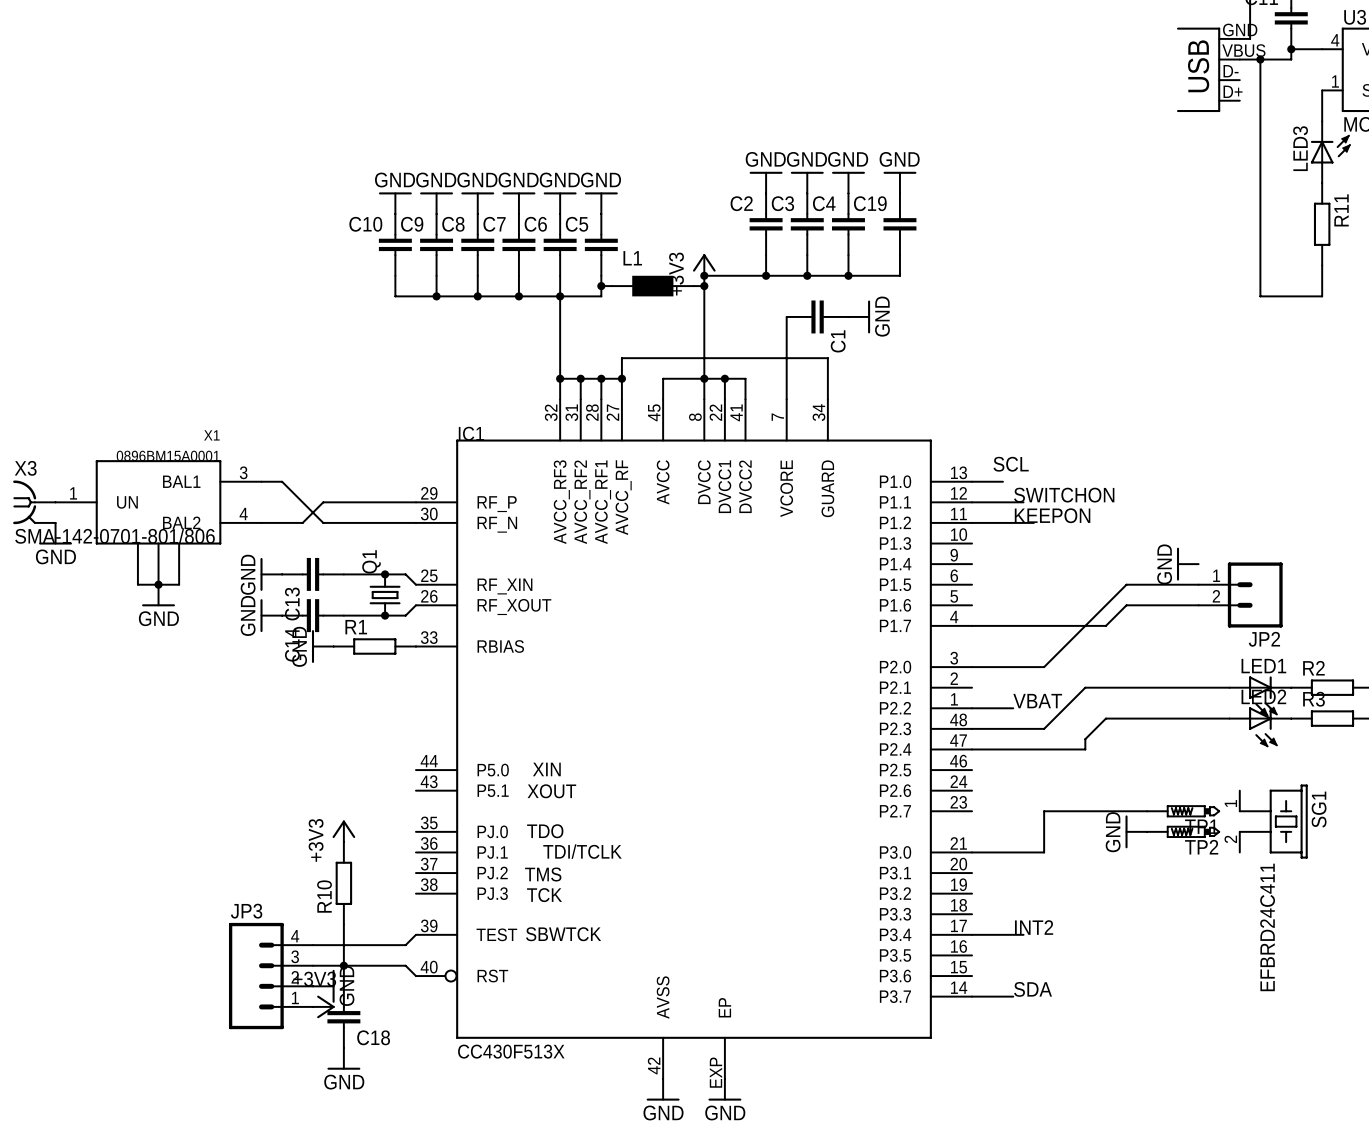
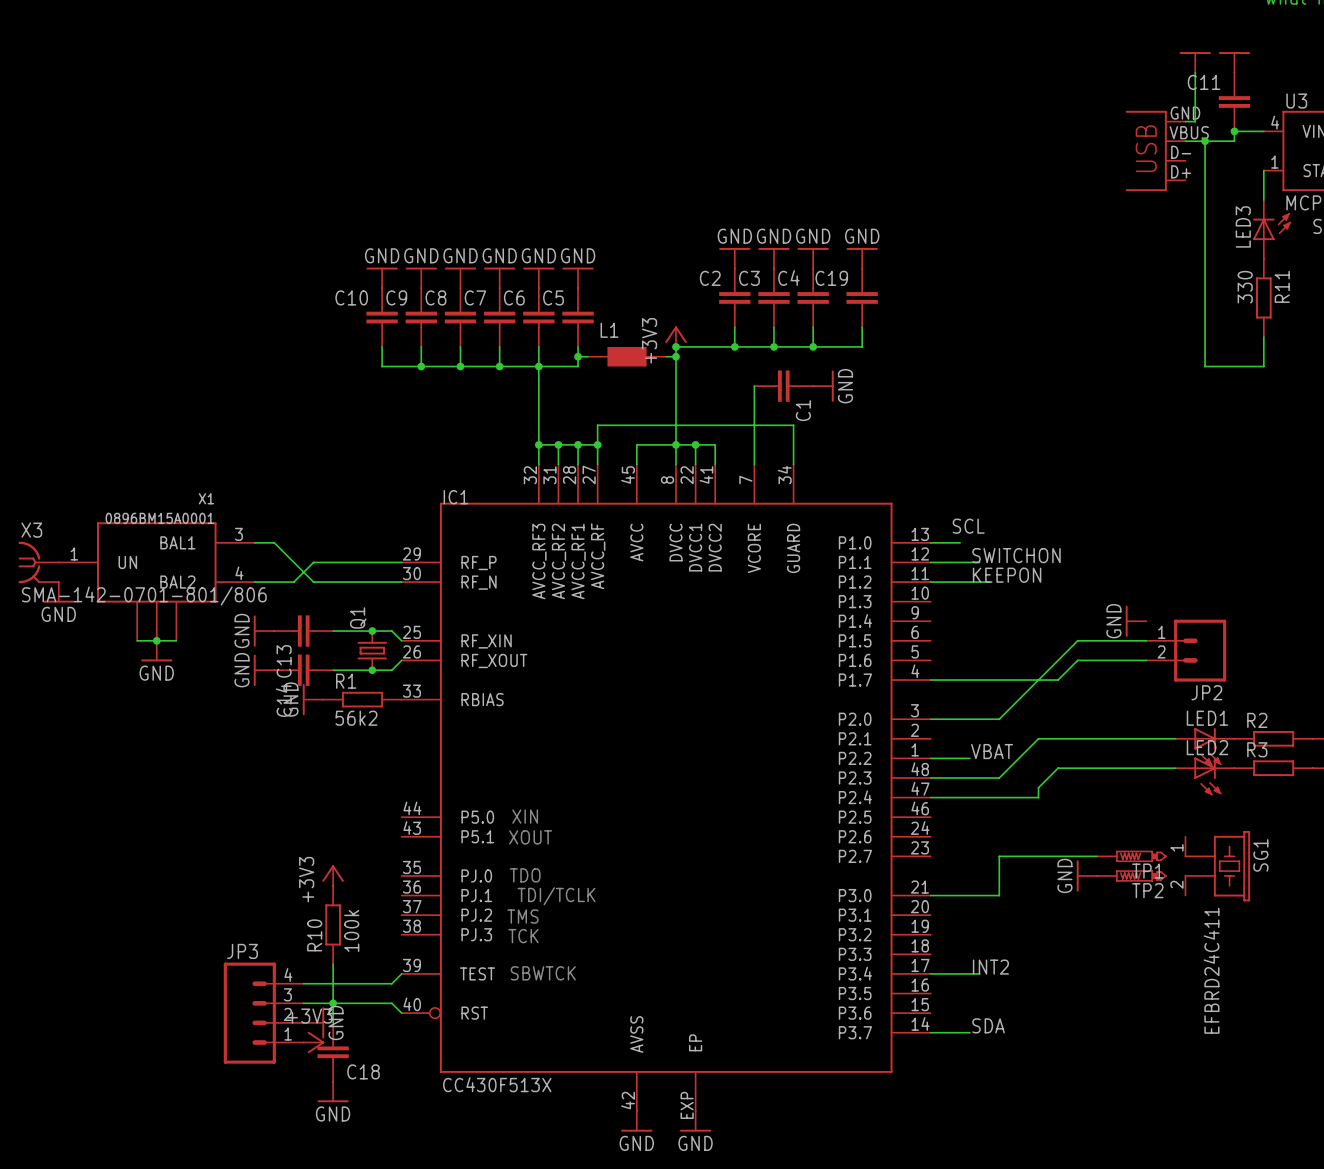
R11 value: none -> 330 (1245, 287)
R1 value: none -> 56k2 (356, 718)
R10 value: none -> 100k (351, 930)

